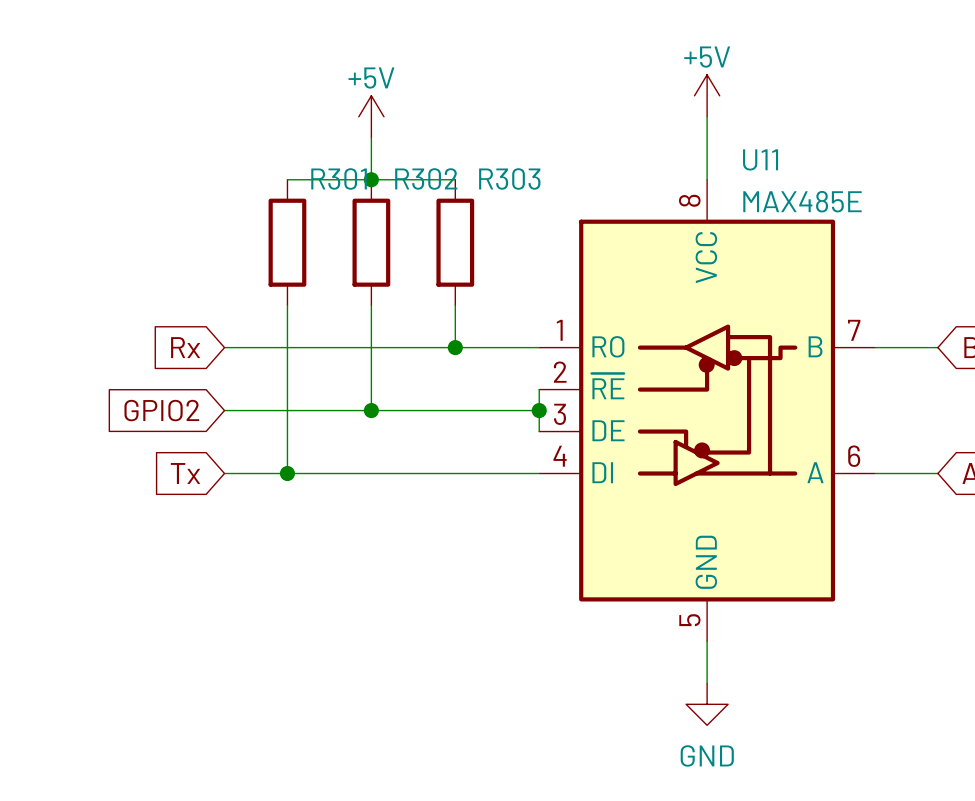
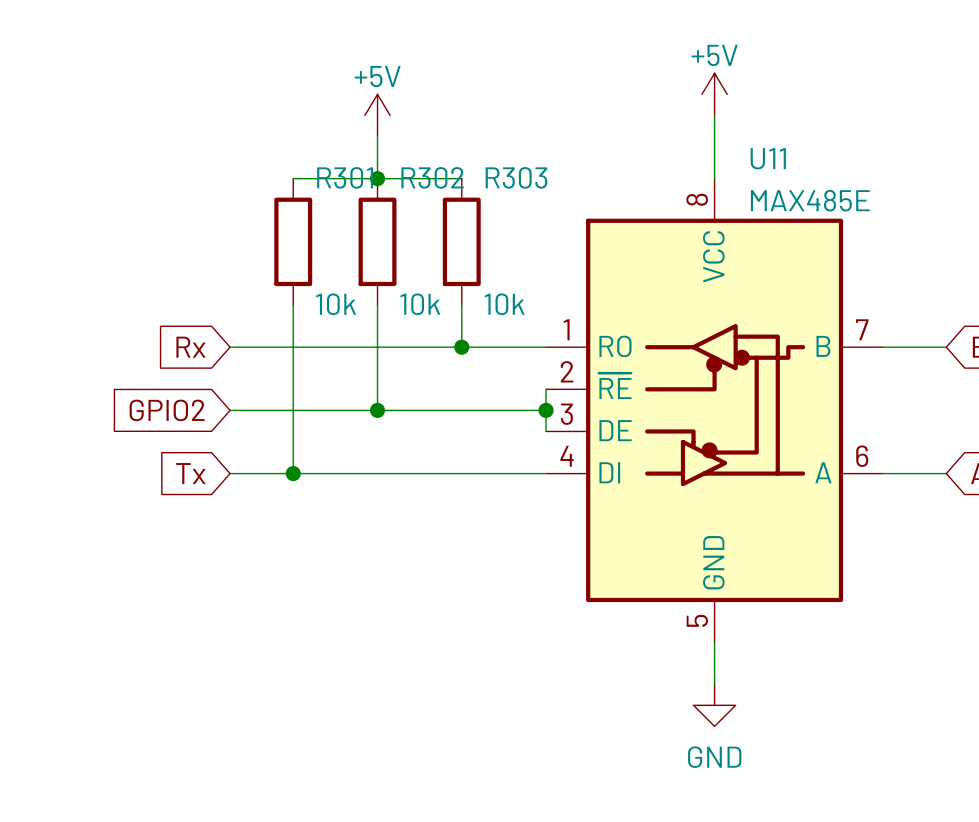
R301 value: none -> 10k (336, 304)
R302 value: none -> 10k (420, 304)
R303 value: none -> 10k (504, 304)

